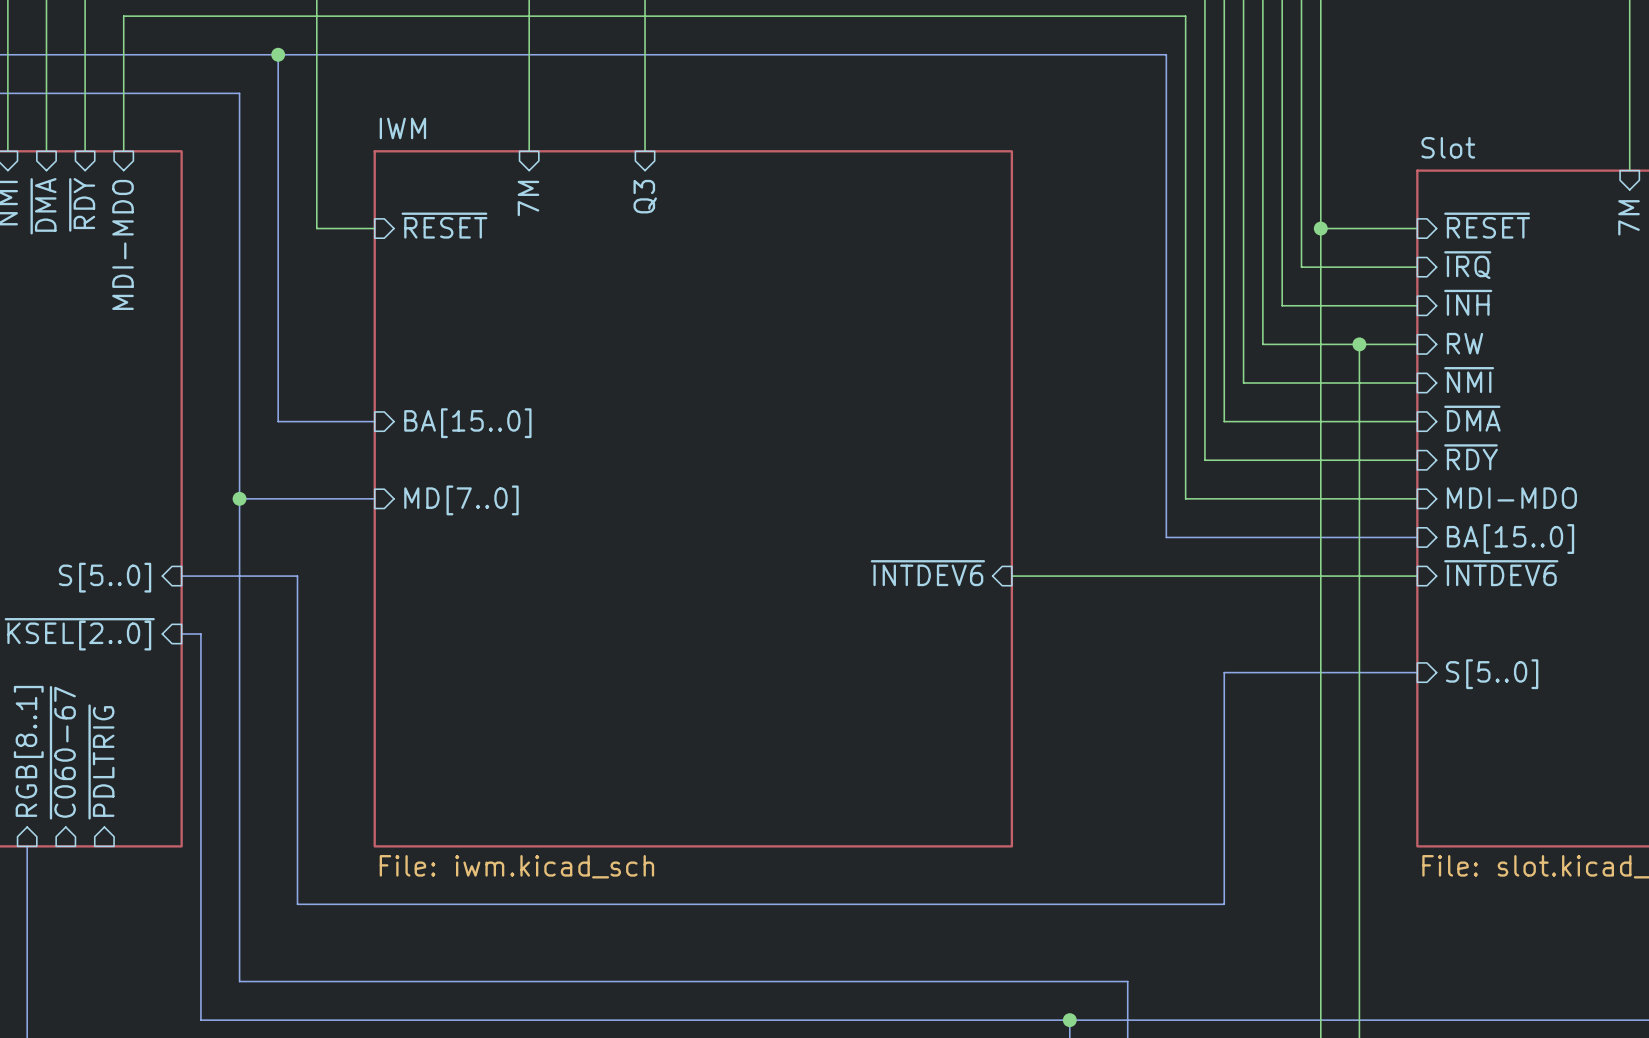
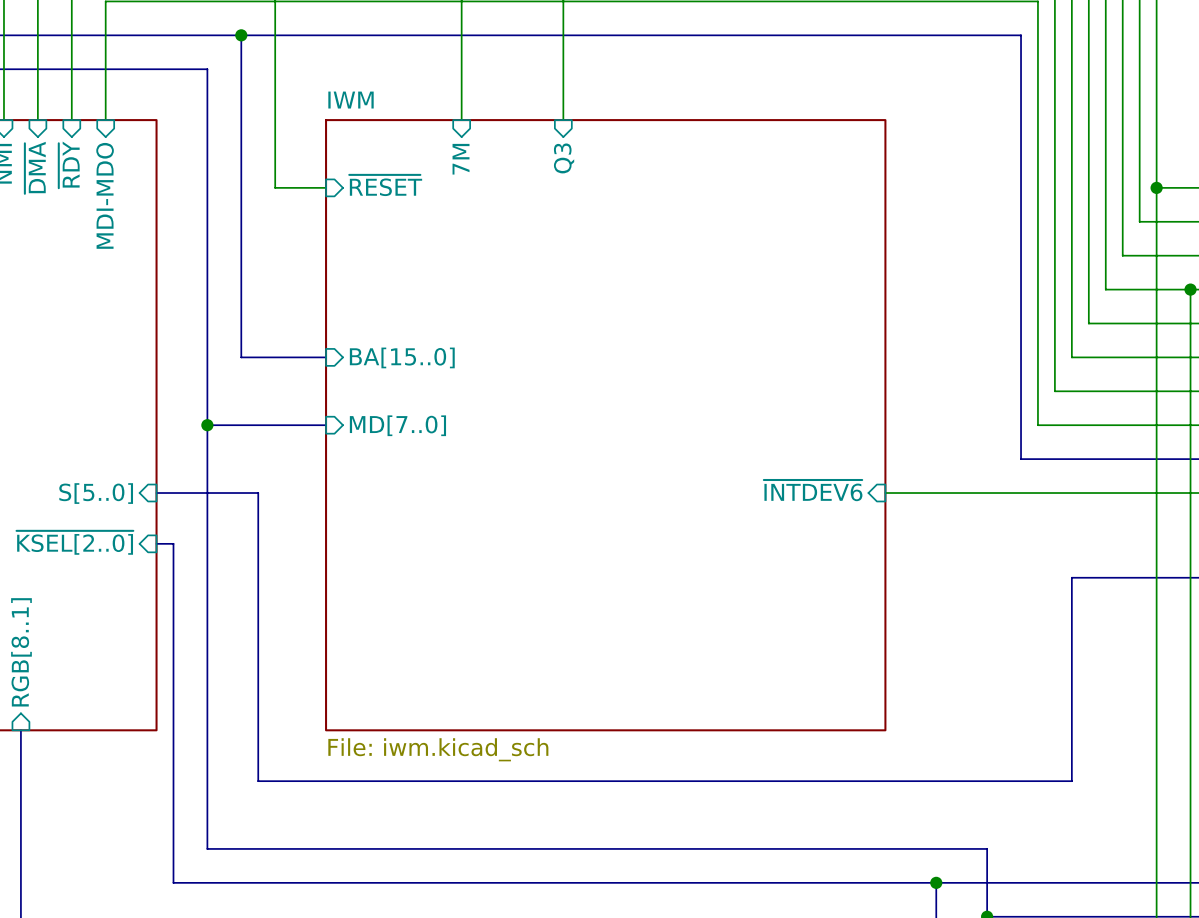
sheet pin: ~{C060-67} (62, 752) -> none
sheet pin: ~{PDLTRIG} (101, 761) -> none

